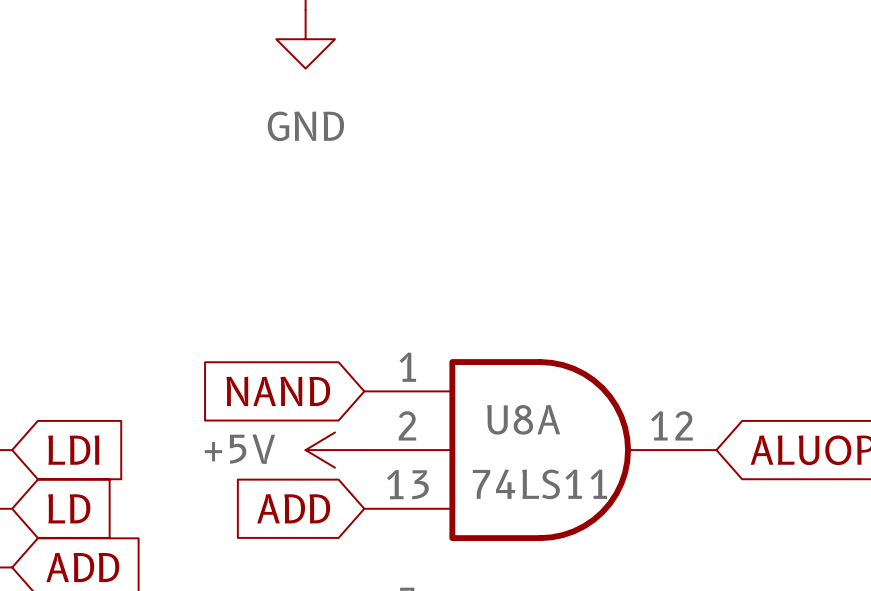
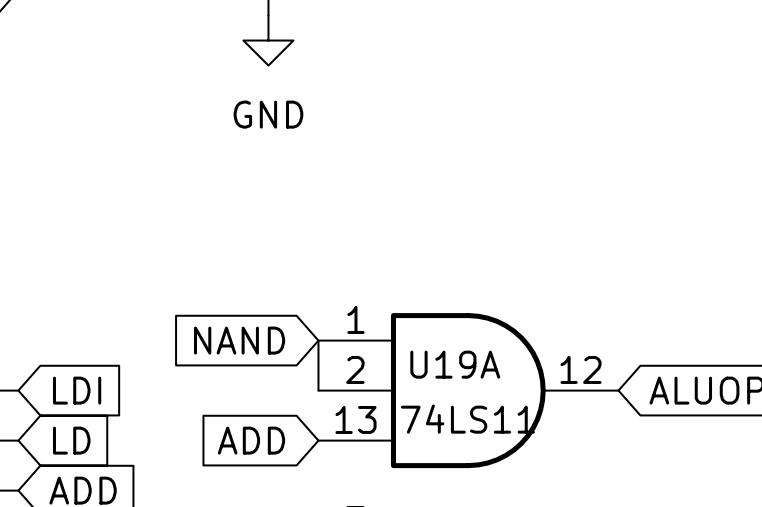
wire: none -> (318, 340) (318, 390)
U8A name: U8A (523, 419) -> U19A (455, 364)
power symbol: +5V (334, 450) -> none

